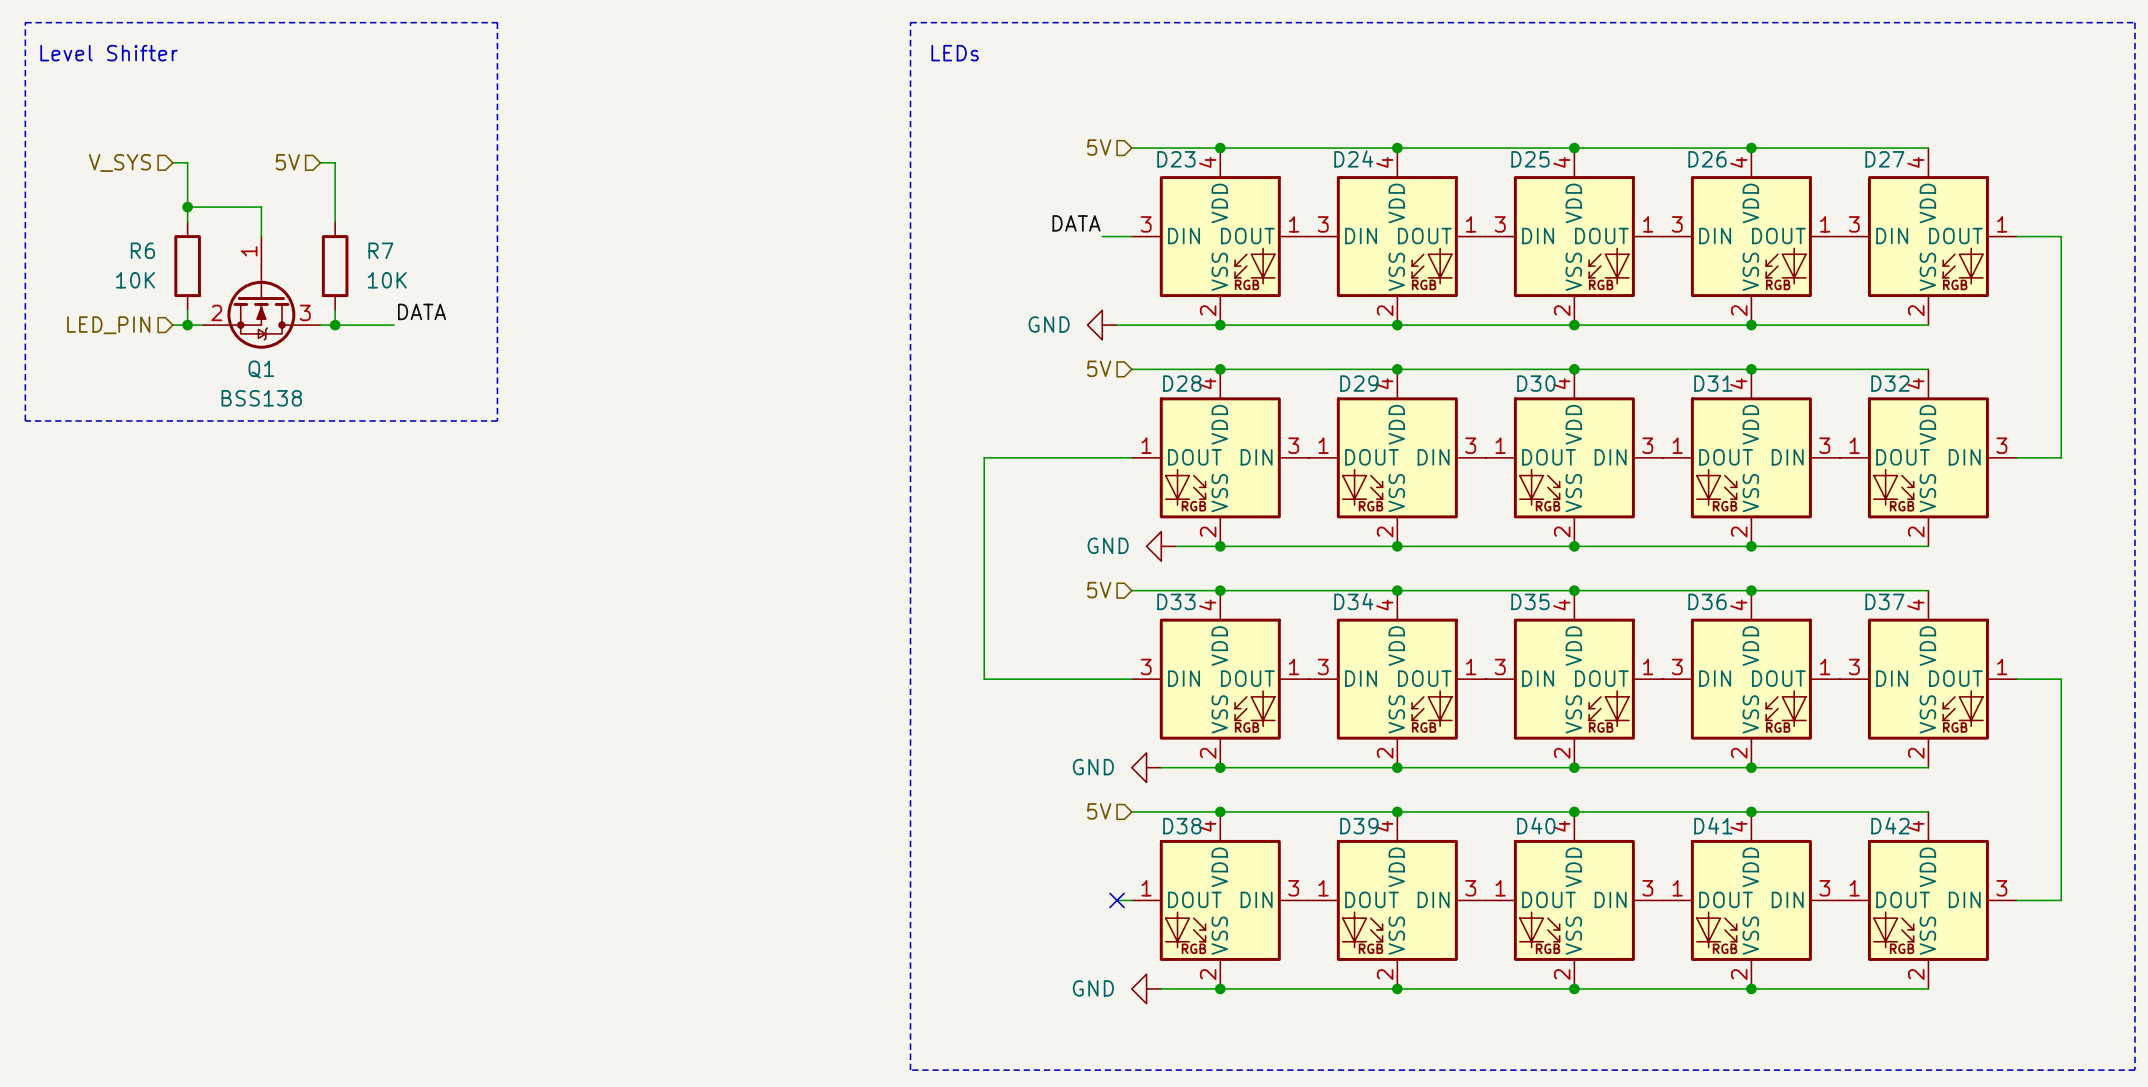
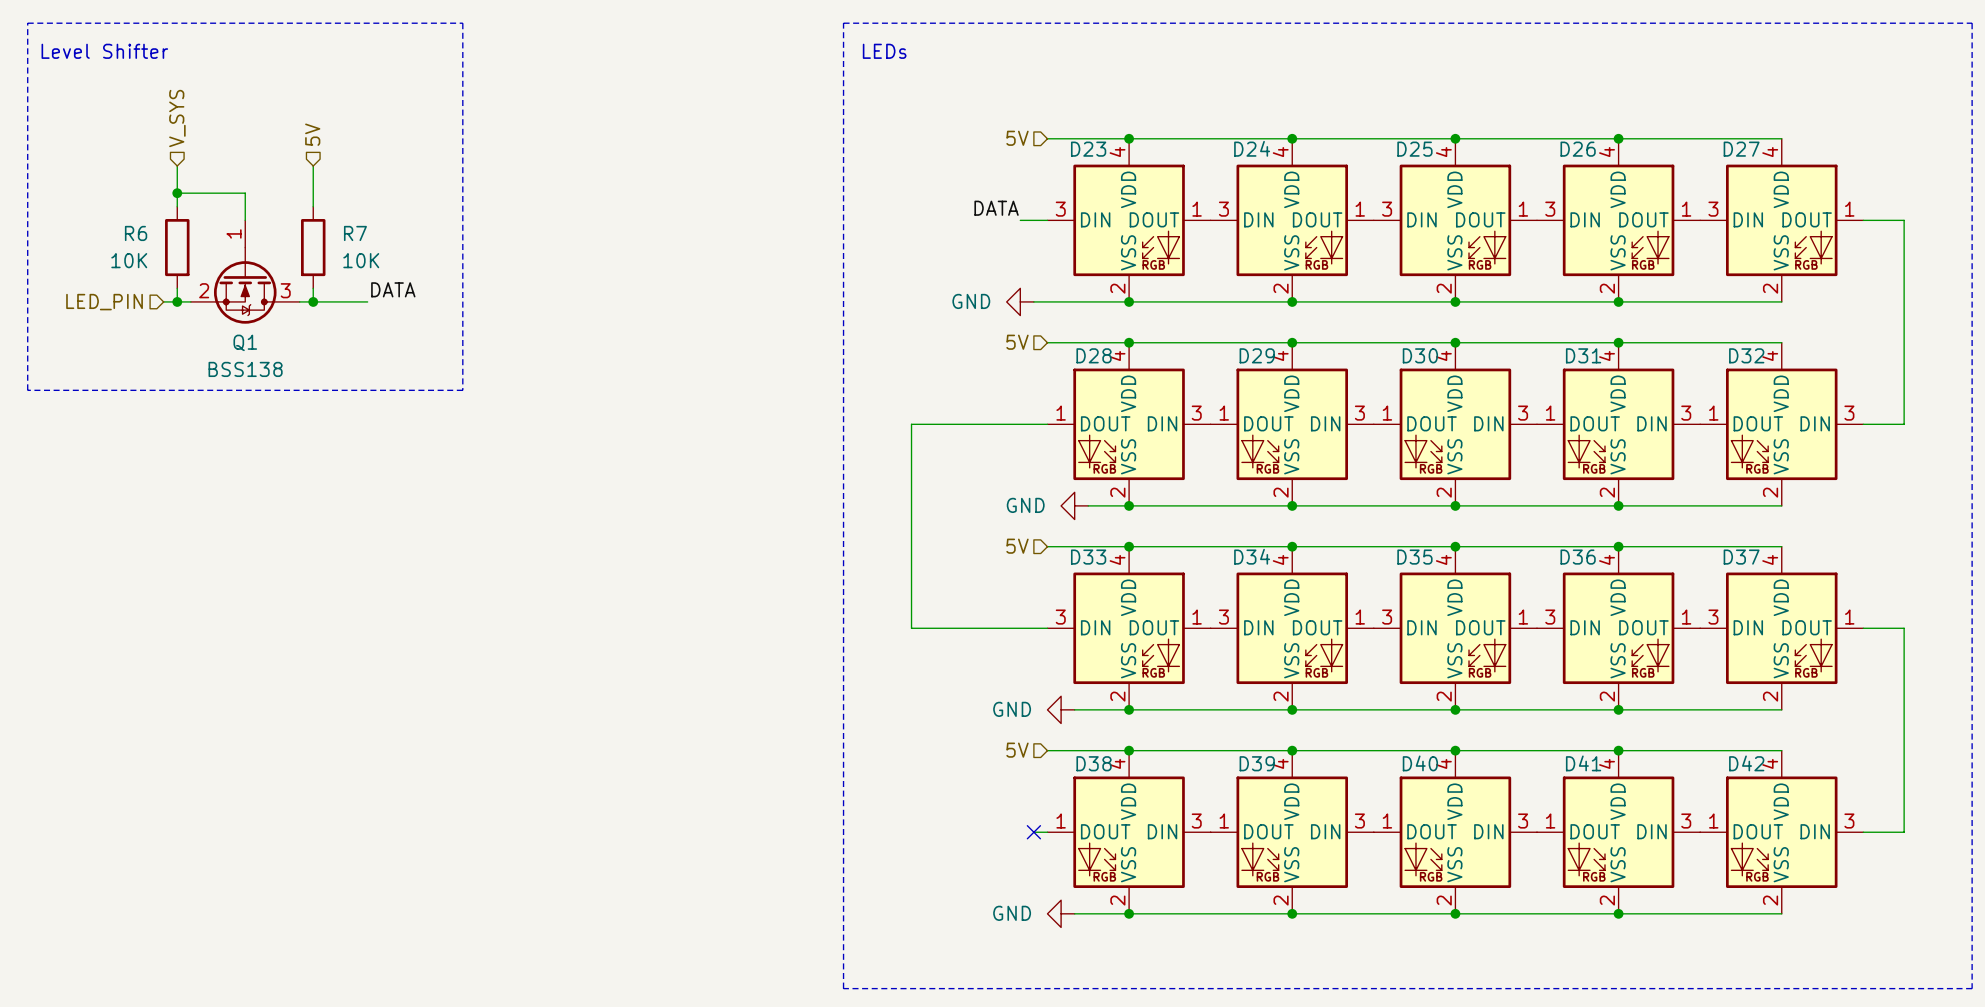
hierarchical label rotation: 0° (119, 162) -> 90° clockwise (177, 118)
hierarchical label position: V_SYS (119, 162) -> V_SYS (177, 118)
wire: (172, 162) (187, 162) (187, 177) -> none
hierarchical label rotation: 0° (287, 162) -> 90° clockwise (312, 134)
hierarchical label position: 5V (287, 162) -> 5V (312, 134)
wire: (320, 162) (335, 162) (335, 177) -> none

